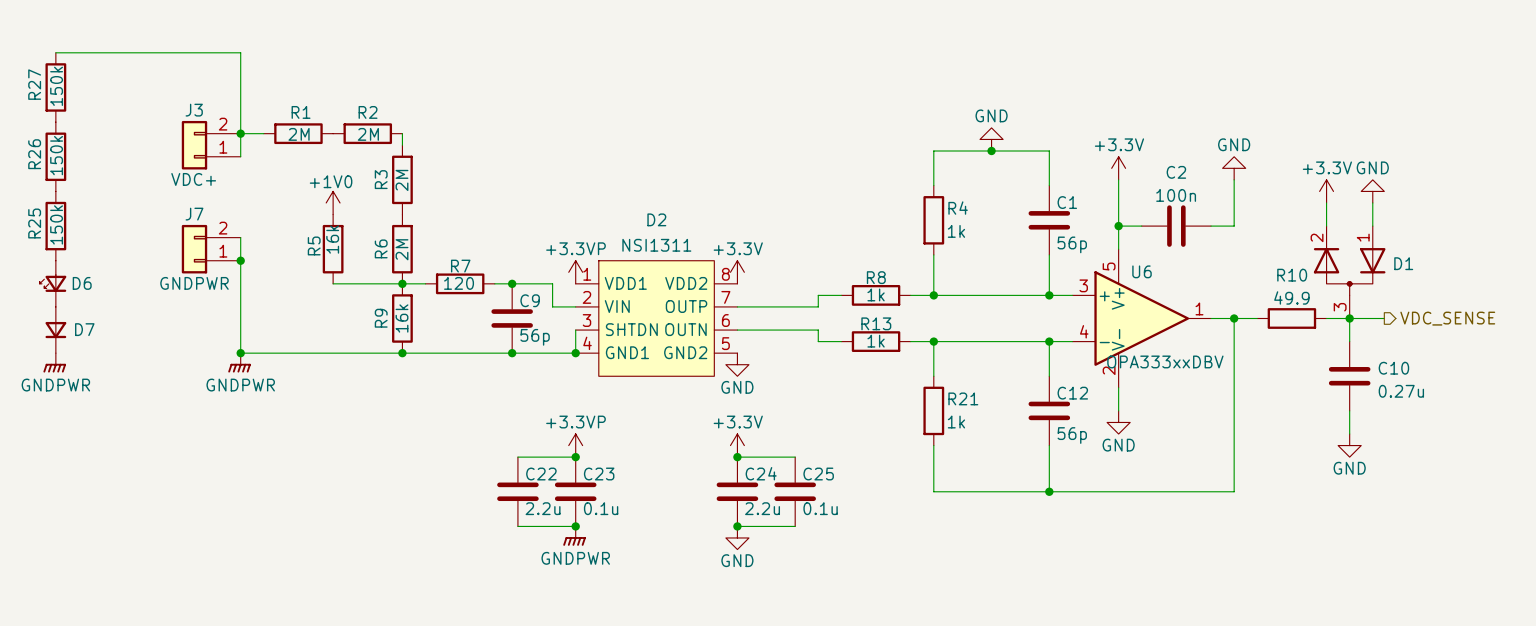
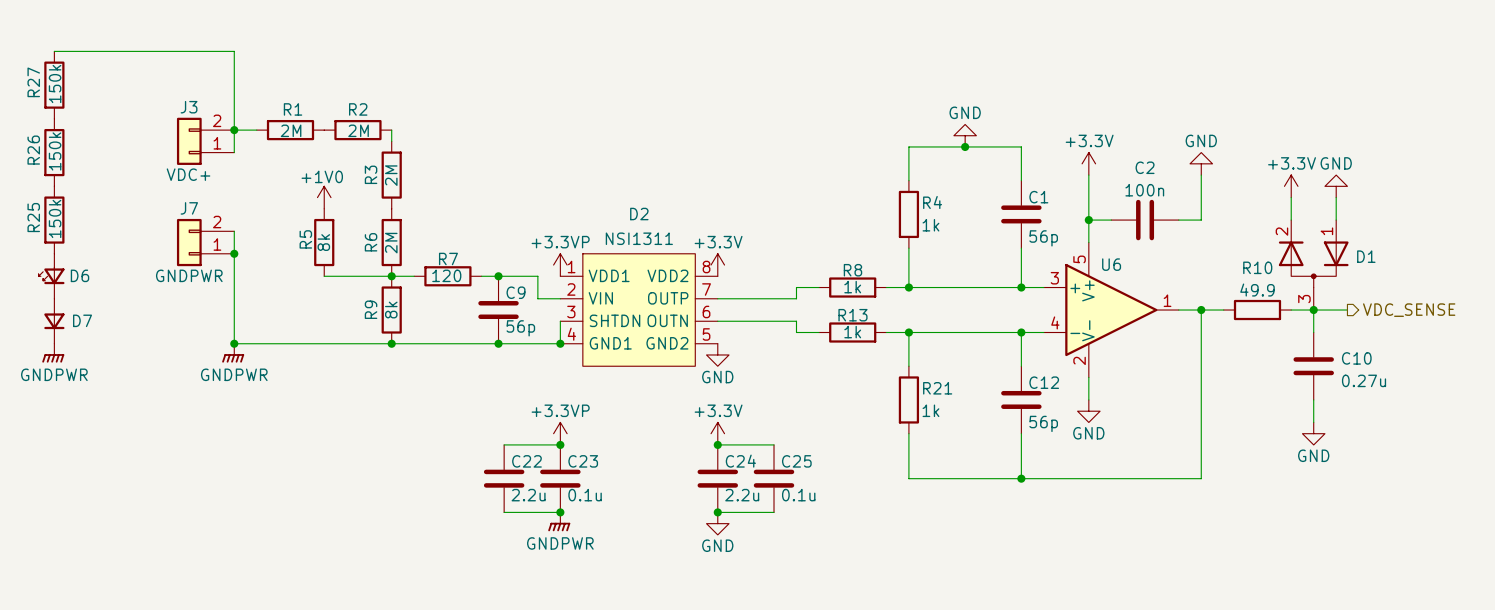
R5 value: 16k (332, 239) -> 8k (323, 242)
R9 value: 16k (401, 318) -> 8k (391, 310)
U6 value: OPA333xxDBV (1165, 361) -> none

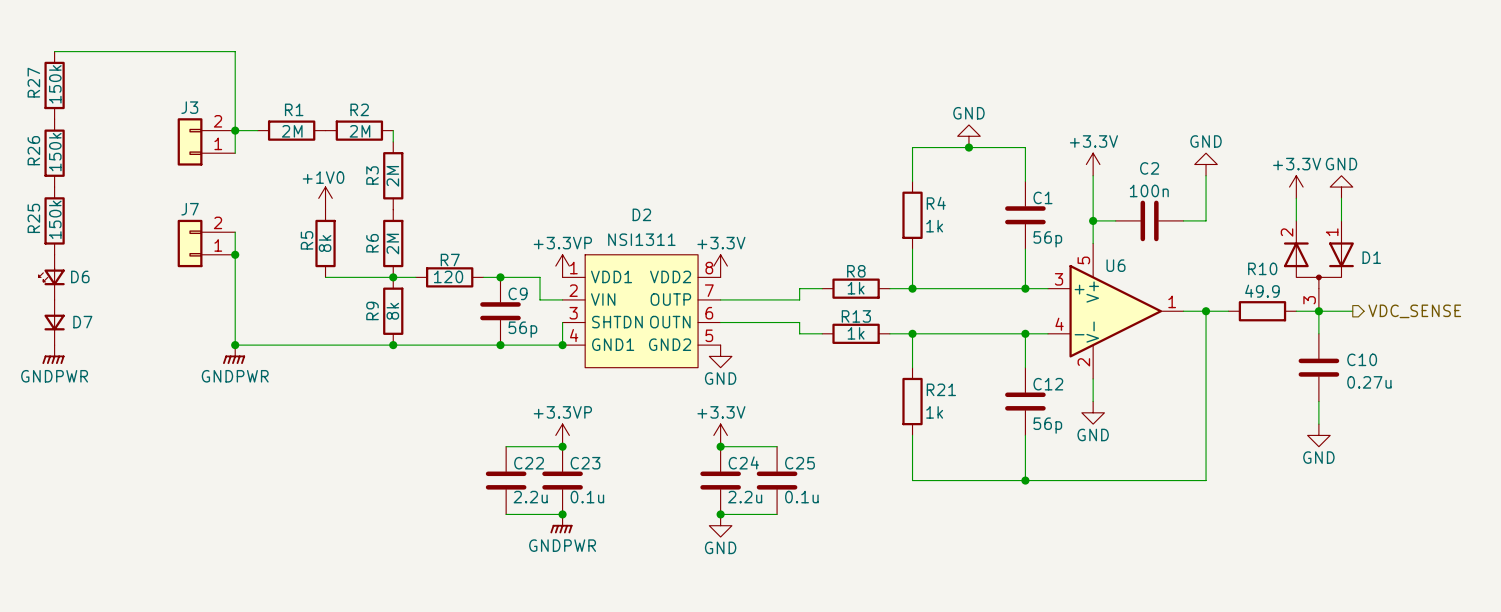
J3 text: VDC+ (188, 174) -> none
J7 text: GNDPWR (189, 275) -> none

